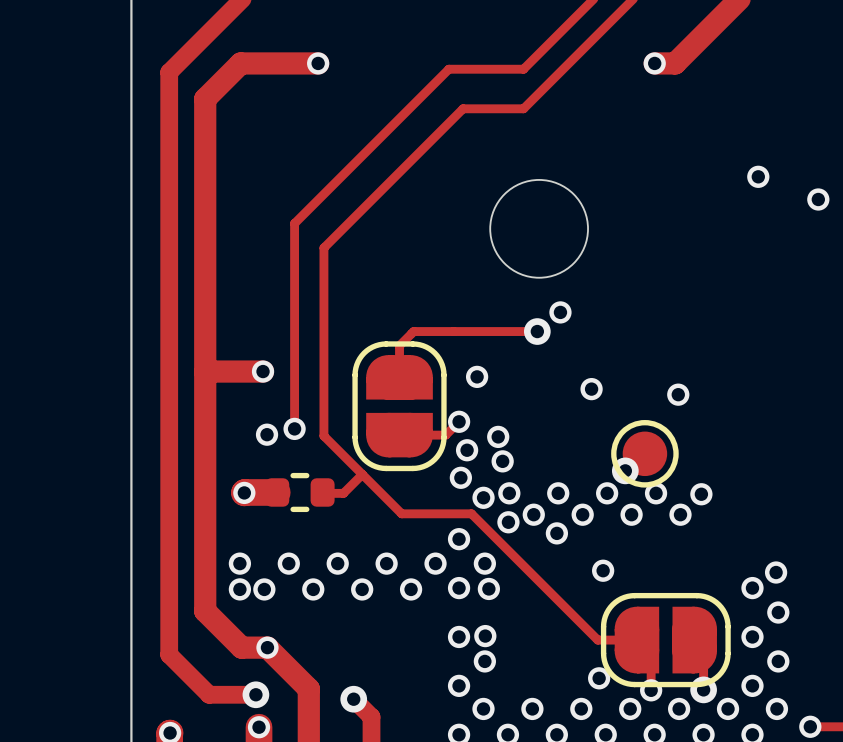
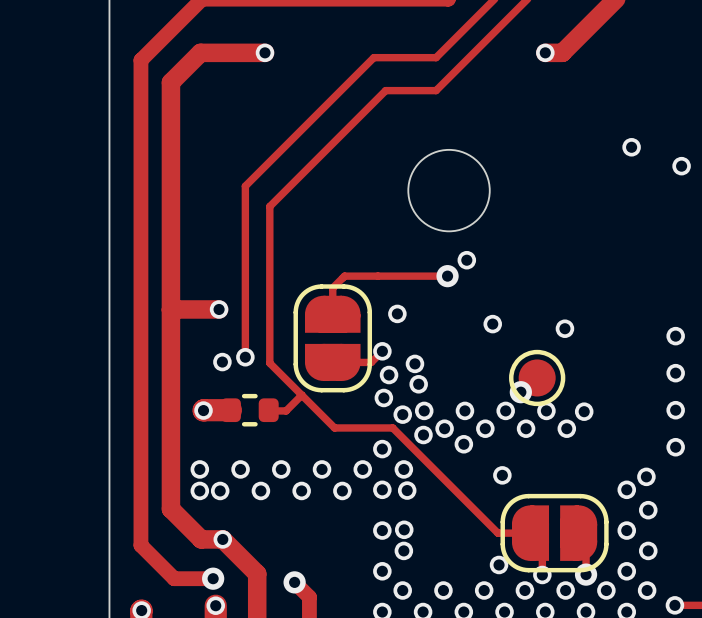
via: none -> (675, 336)
via: none -> (675, 373)
via: none -> (675, 410)
via: none -> (675, 447)

